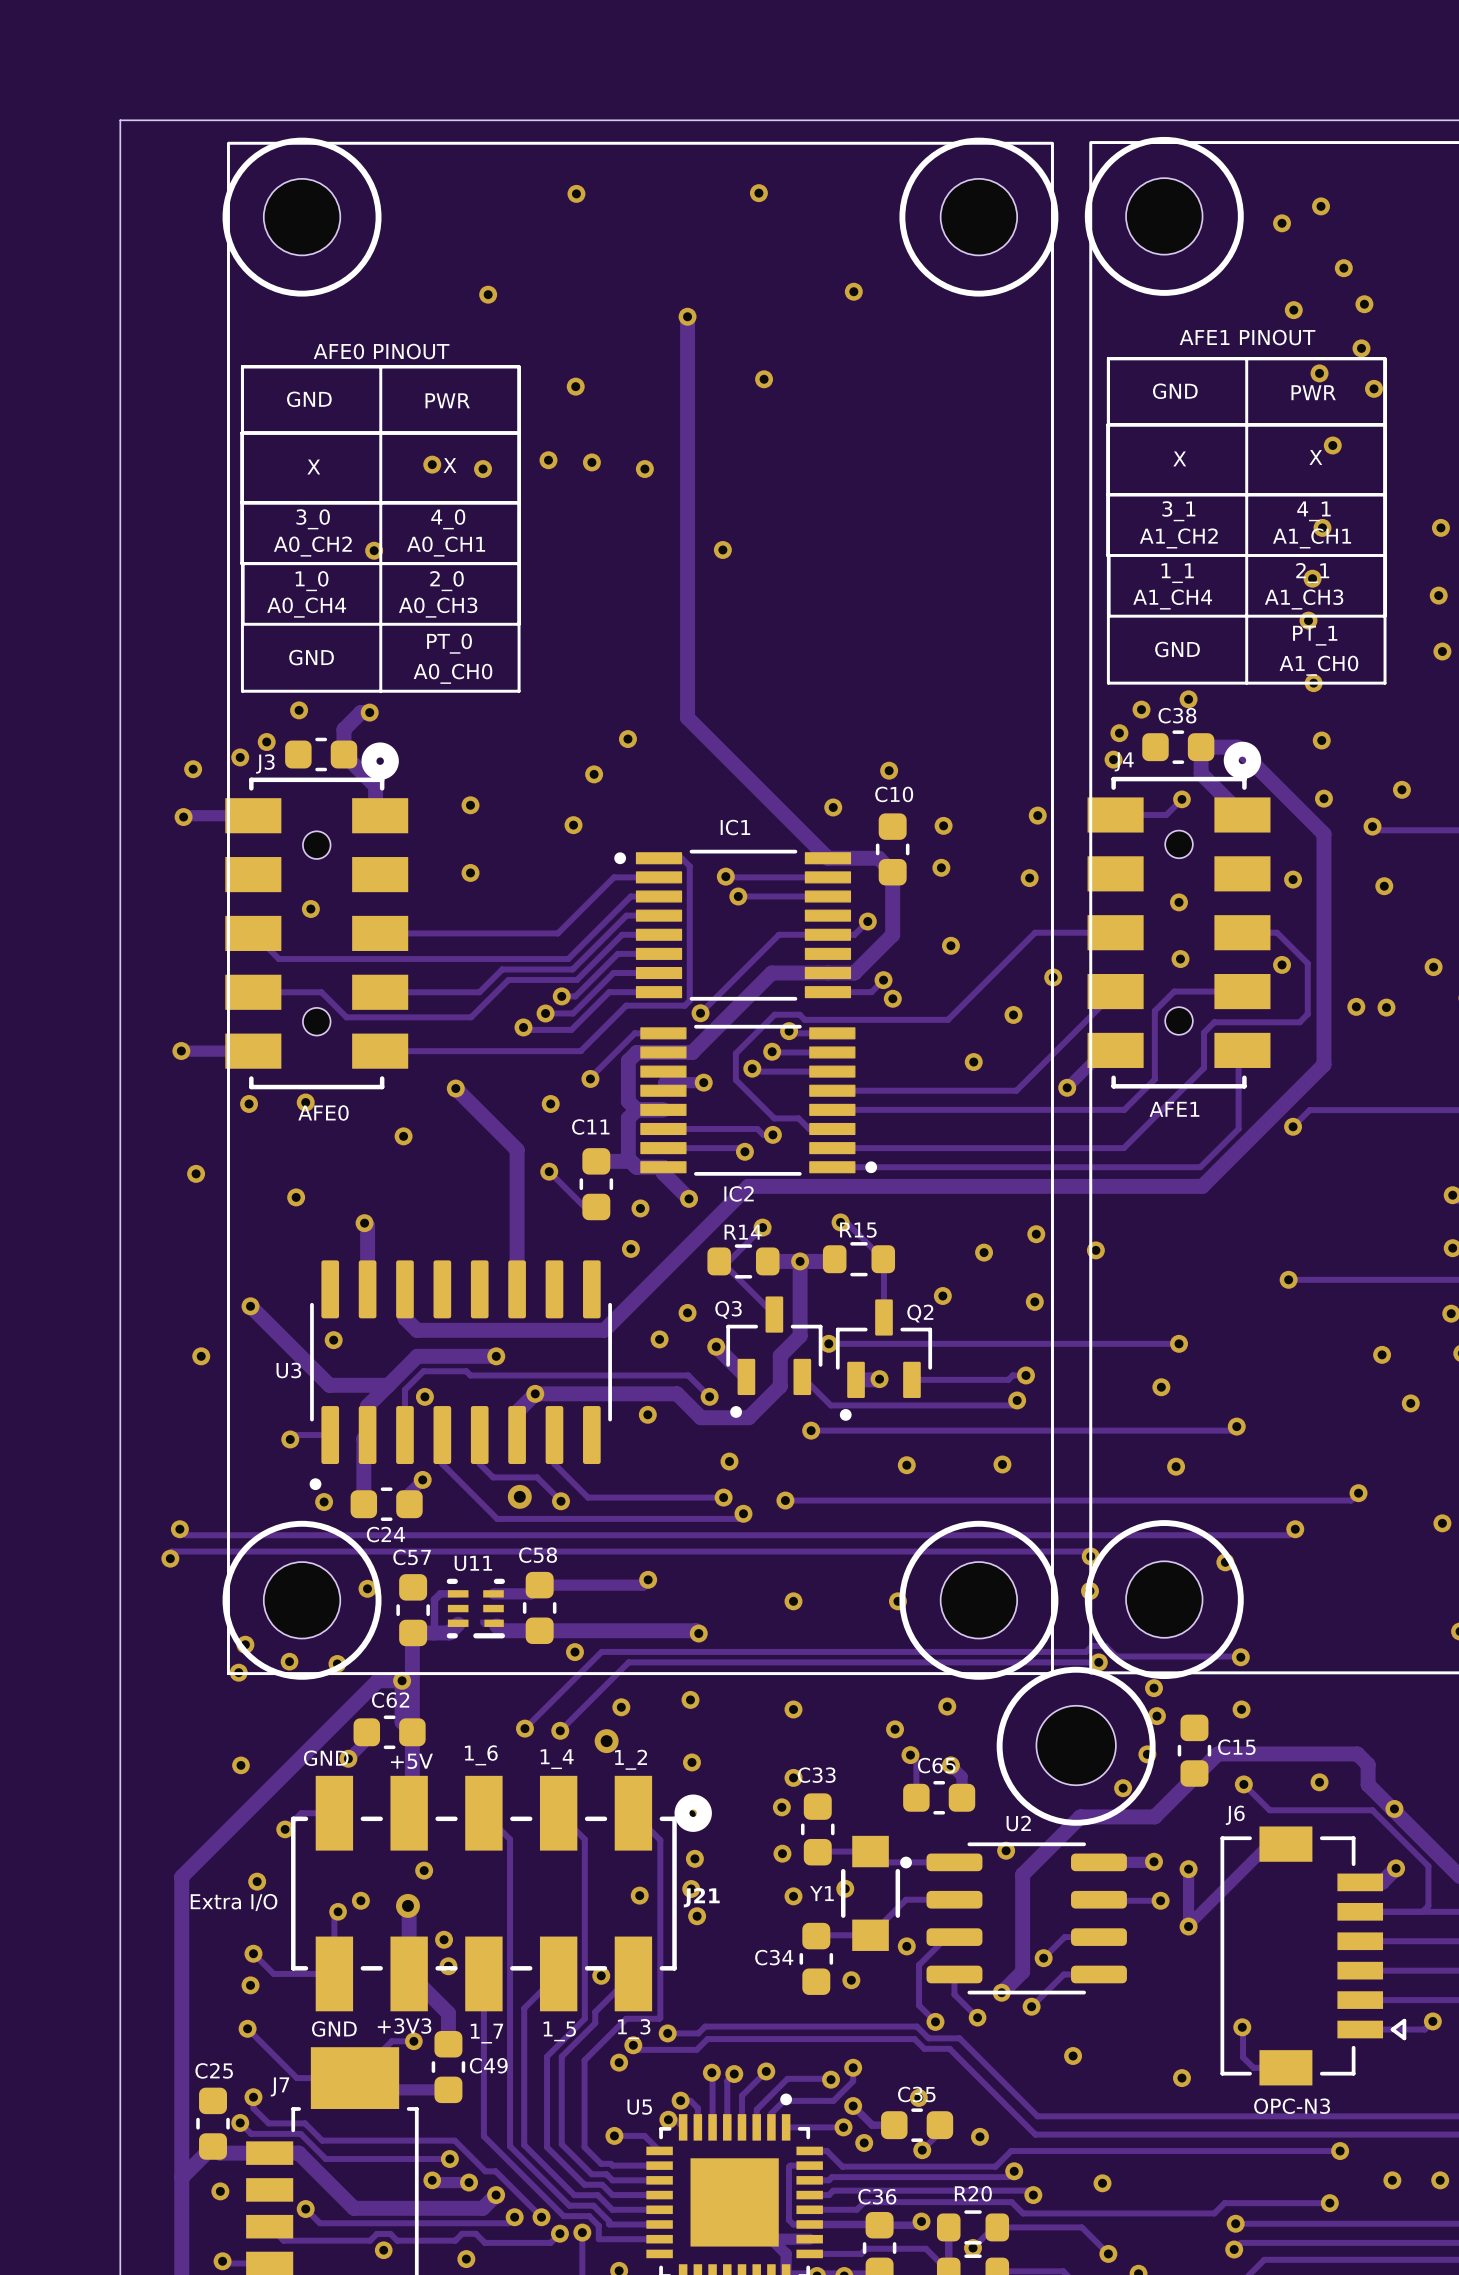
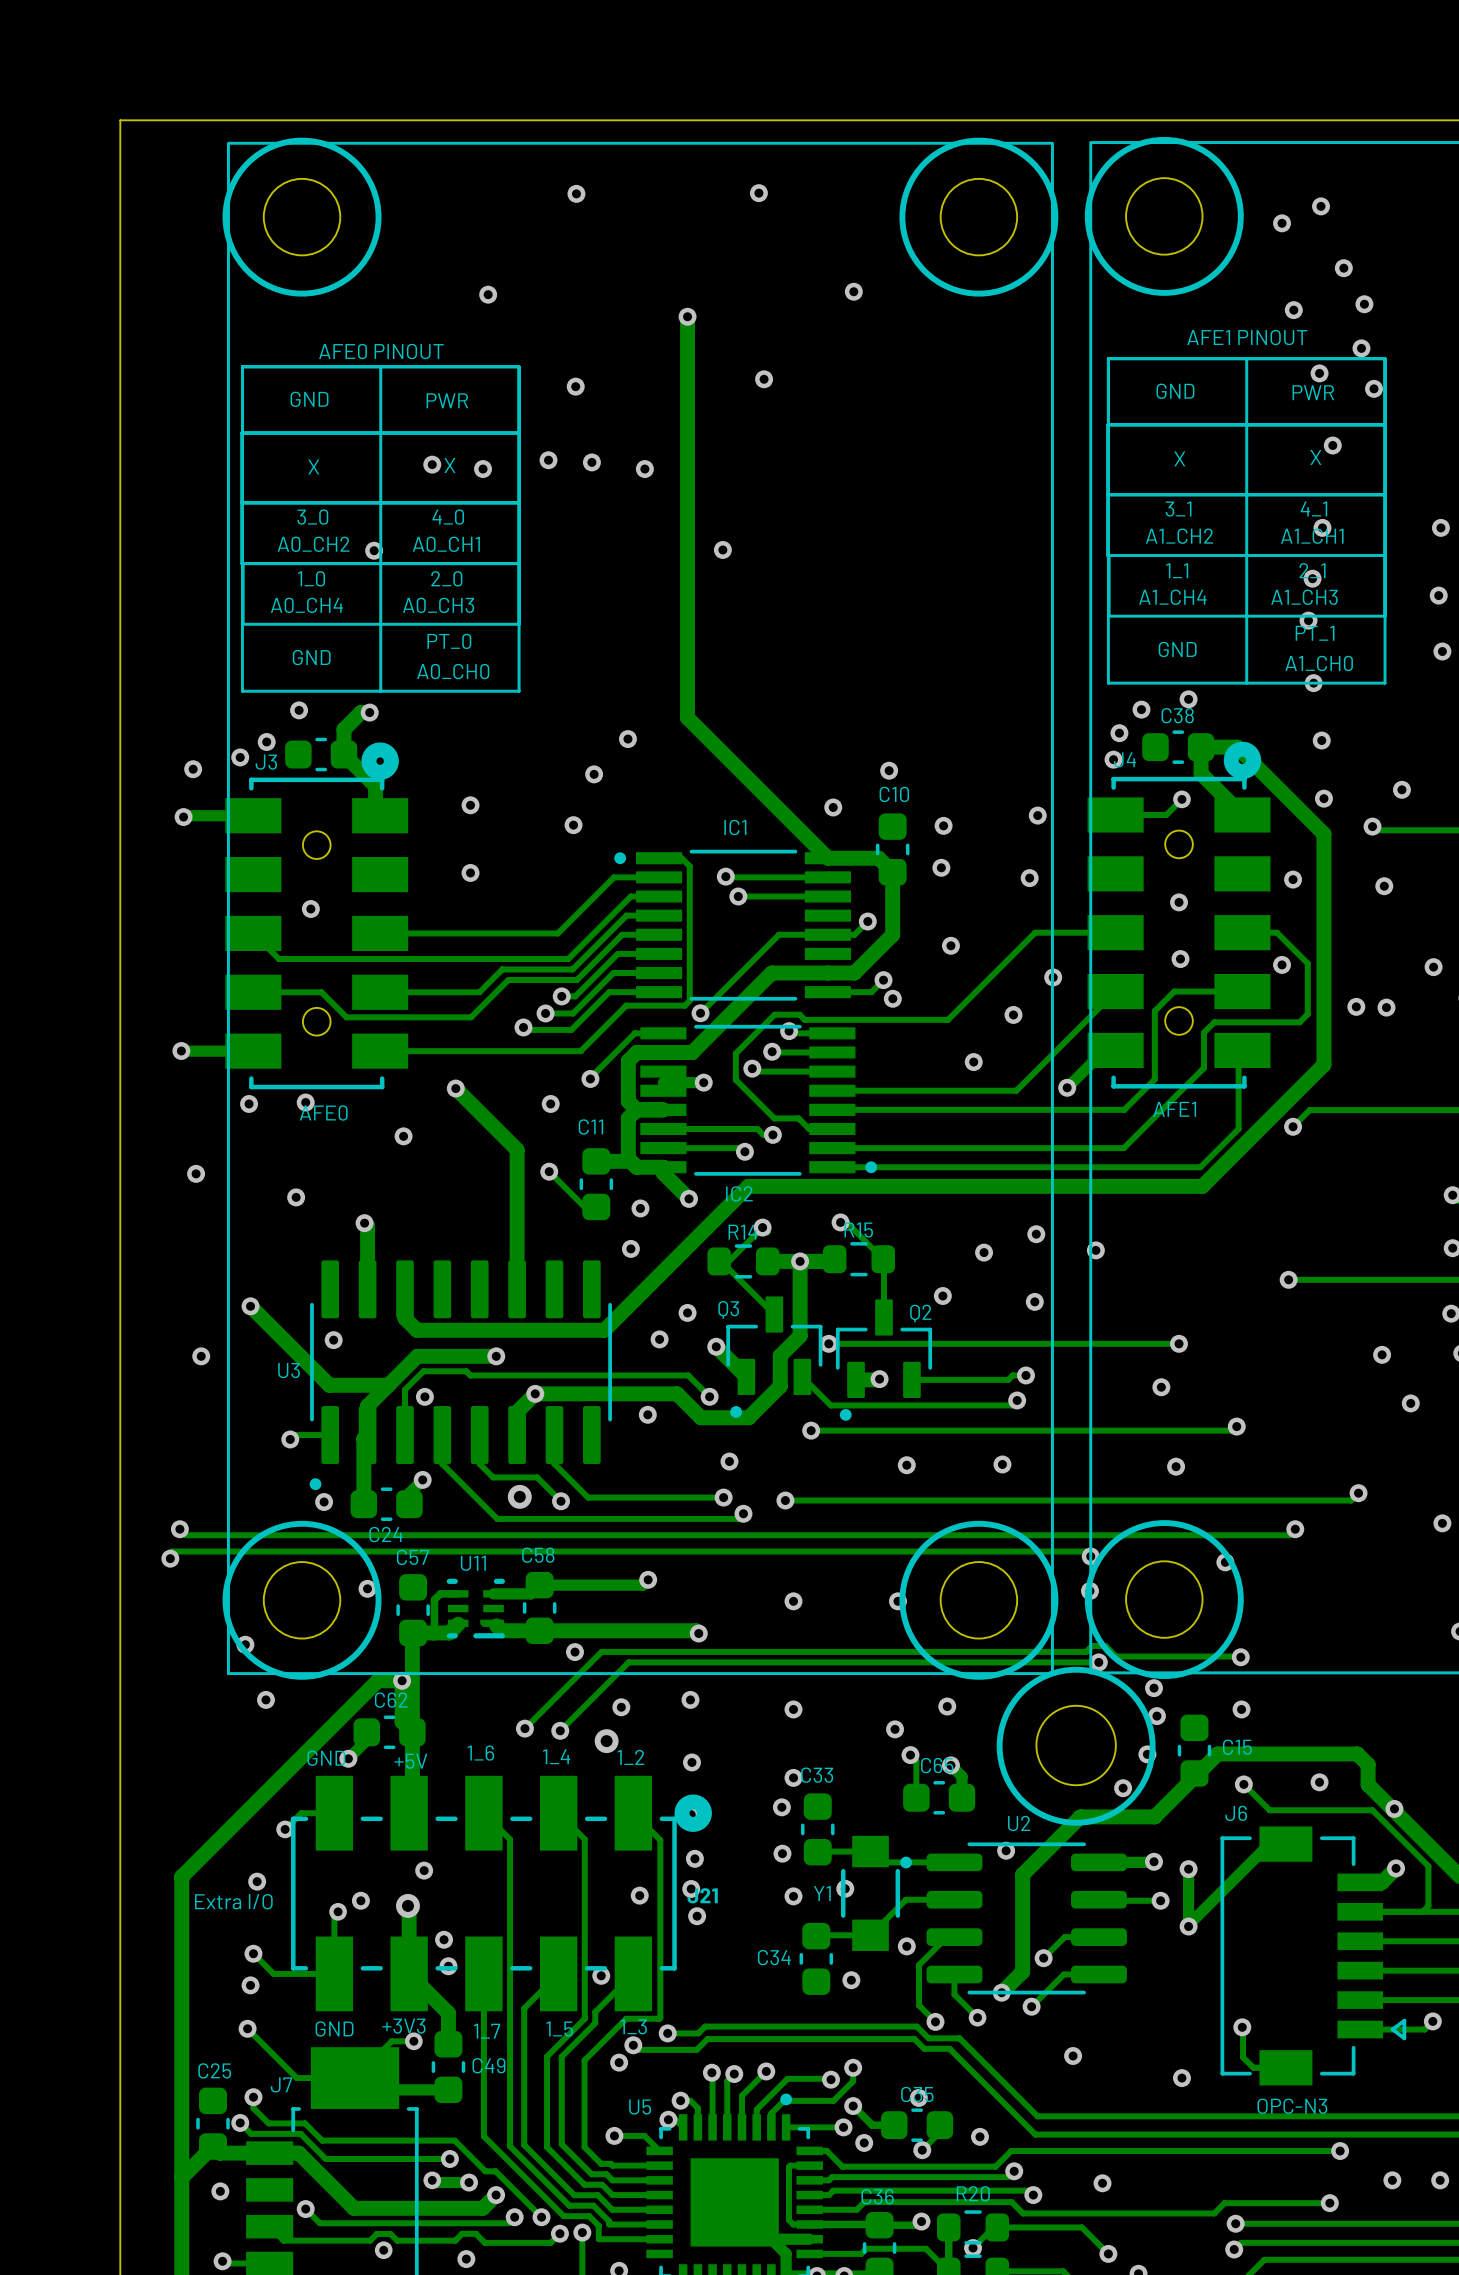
via: (289, 1661) -> none
via: (337, 1663) -> none
via: (238, 1672) -> none
via: none -> (265, 1699)
via: (240, 1765) -> none

